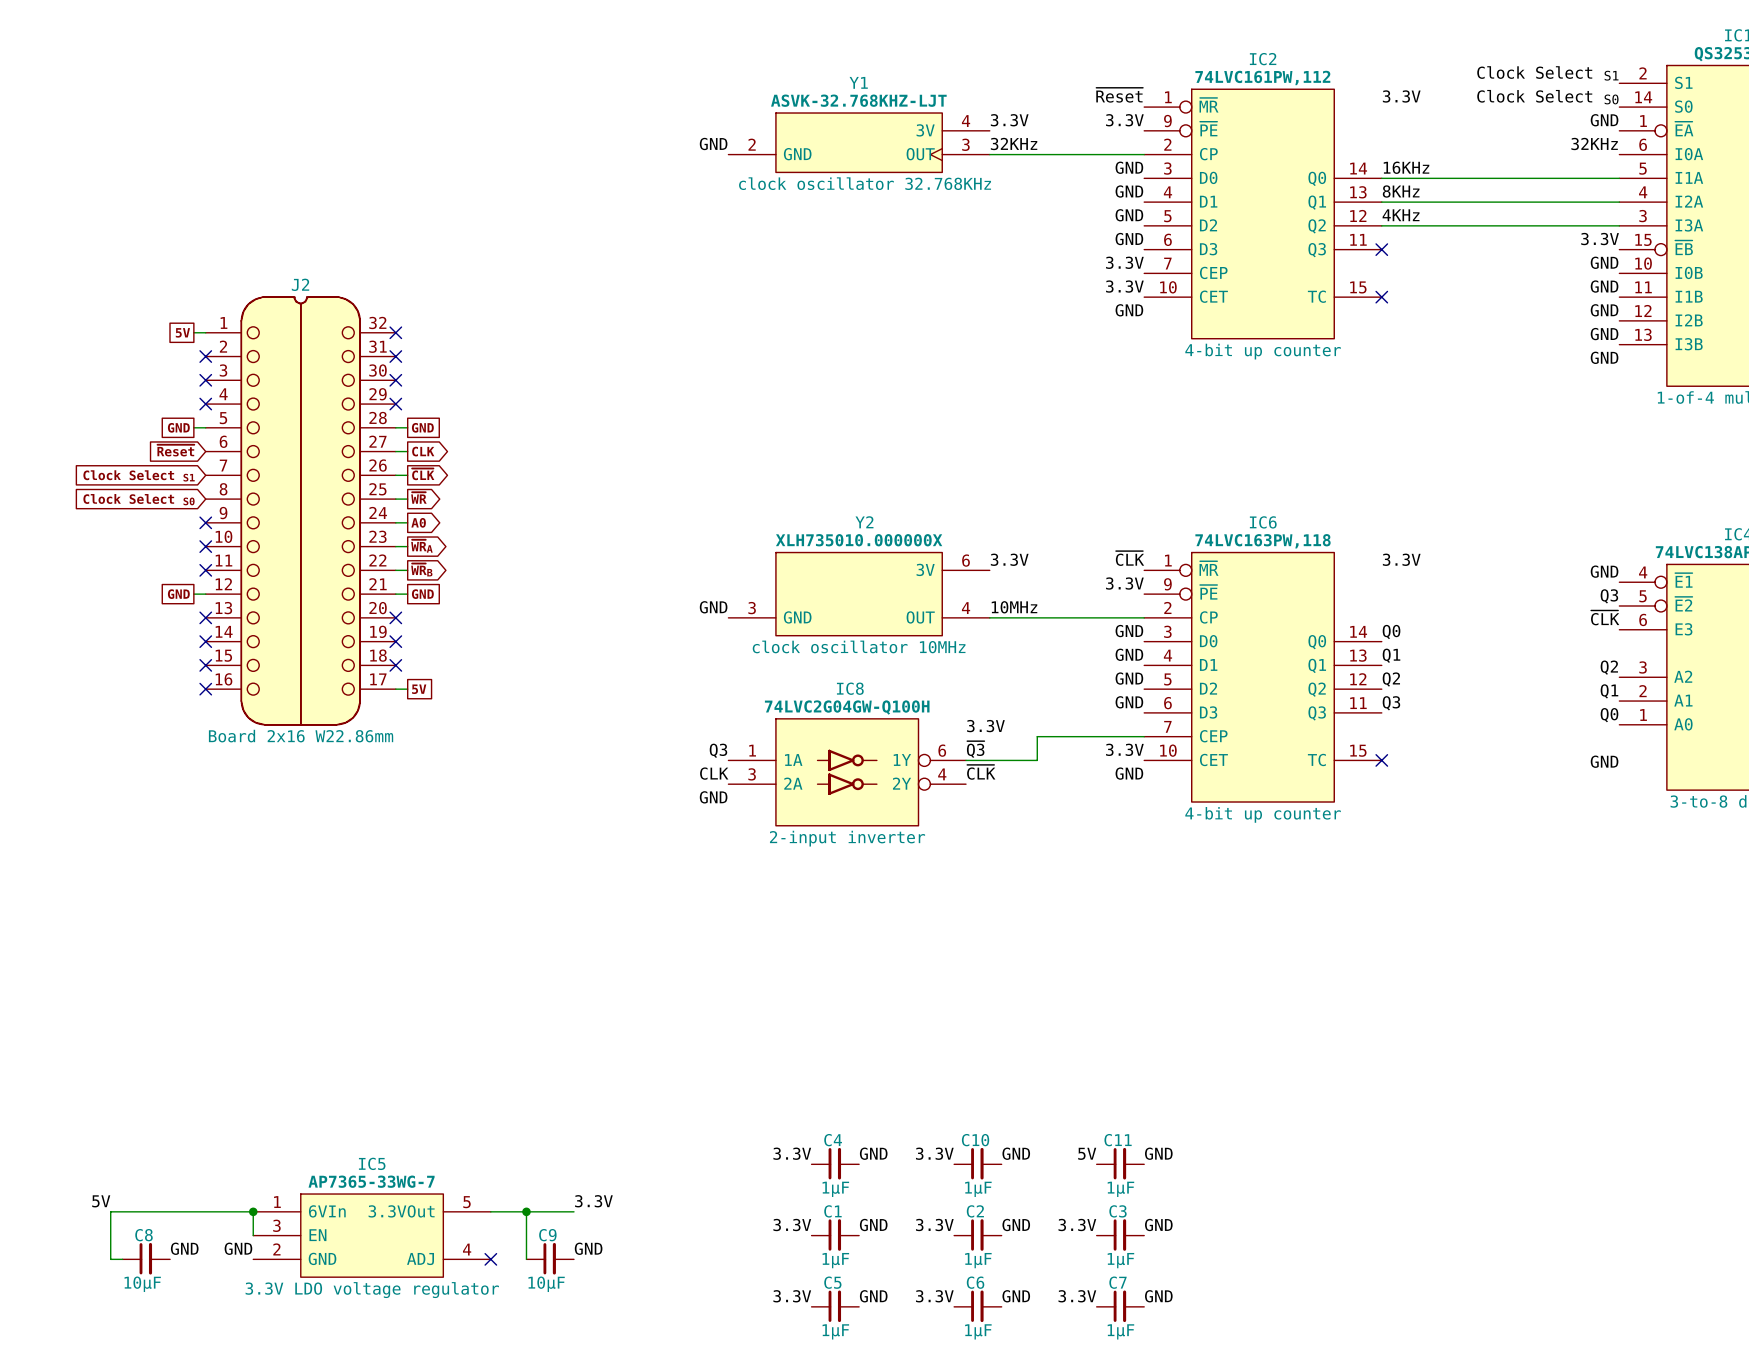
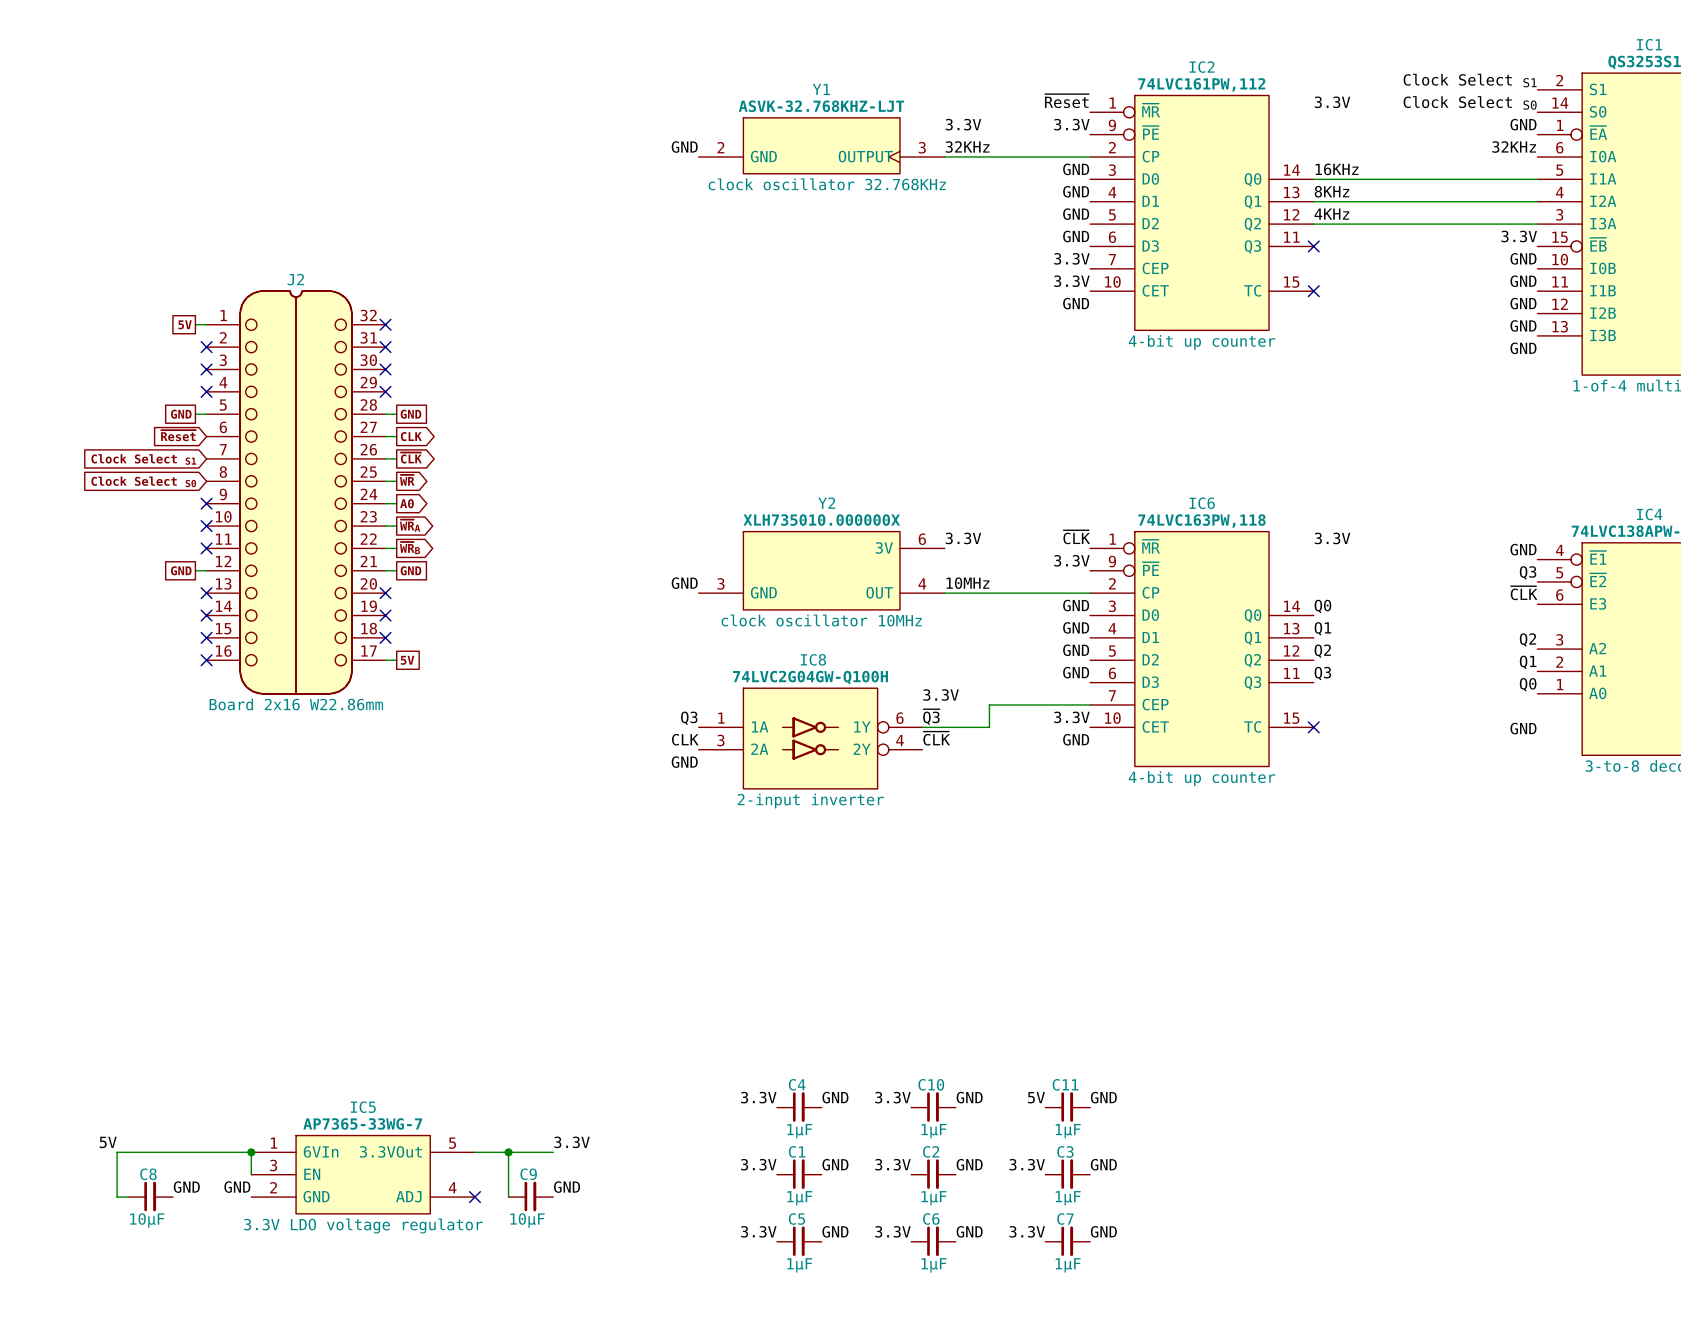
Y1 symbol: [728, 112, 990, 174] -> [698, 117, 945, 175]

